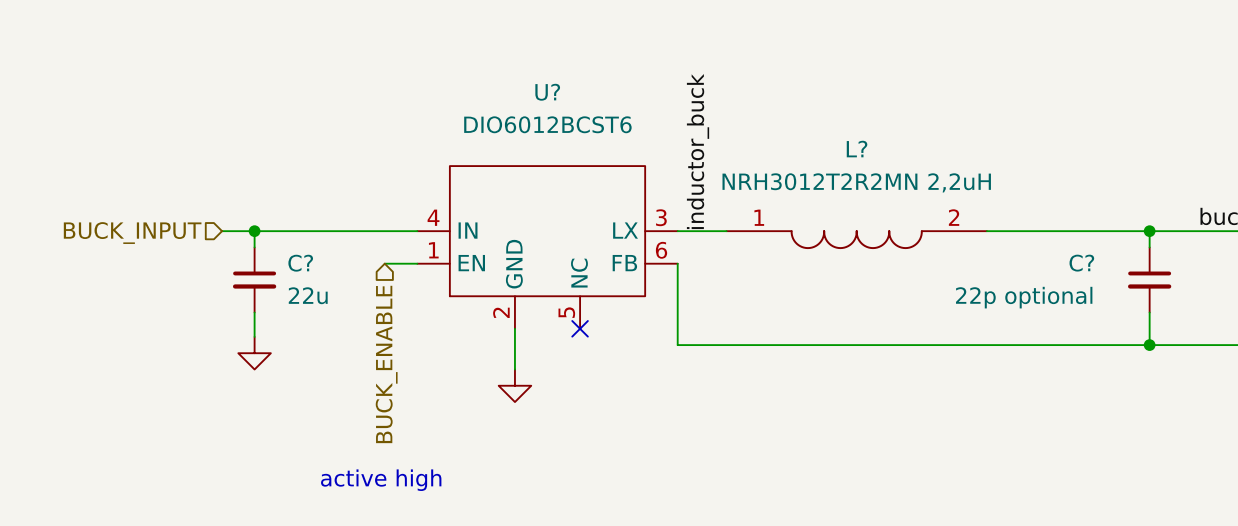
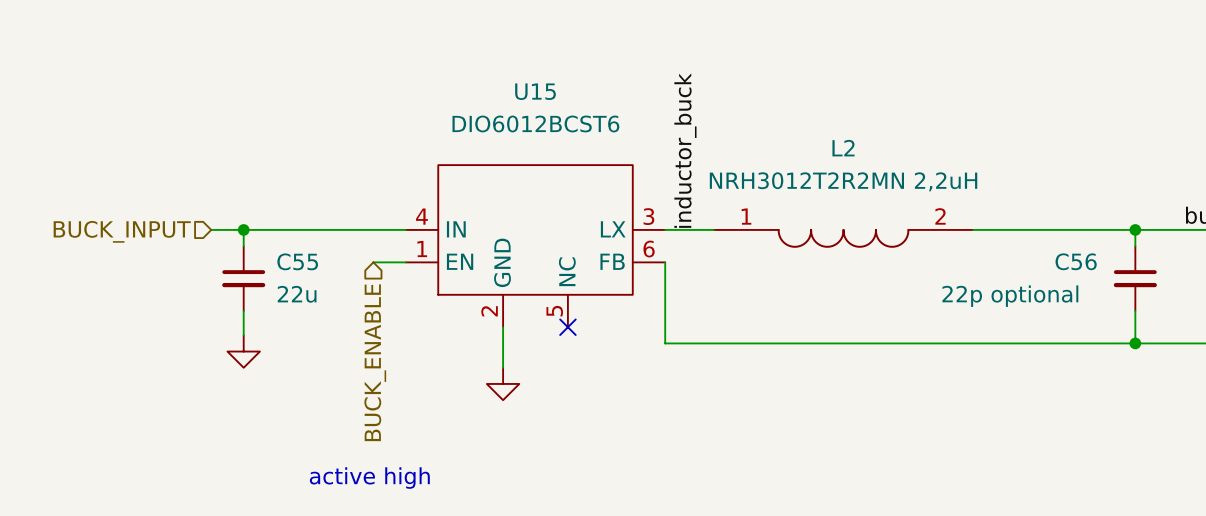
U? name: U? (547, 92) -> U15 (535, 91)
L? name: L? (857, 149) -> L2 (843, 148)
C? name: C? (300, 263) -> C55 (297, 261)
C? name: C? (1081, 263) -> C56 (1076, 261)

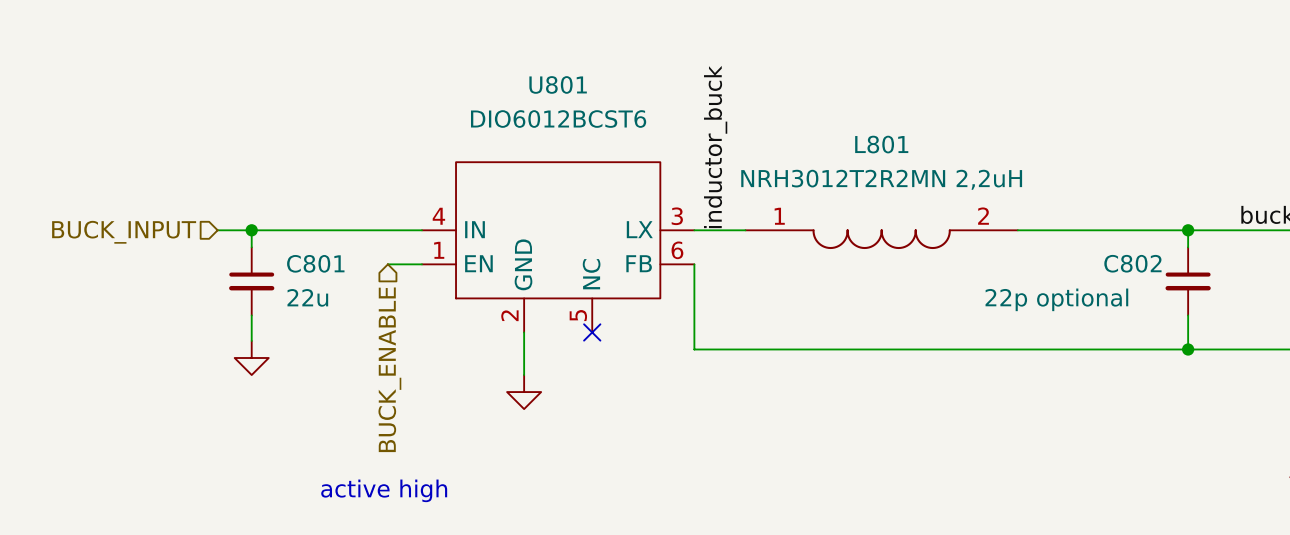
U15 name: U15 (535, 91) -> U801 (558, 84)
L2 name: L2 (843, 148) -> L801 (881, 144)
C55 name: C55 (297, 261) -> C801 (315, 263)
C56 name: C56 (1076, 261) -> C802 (1132, 263)

